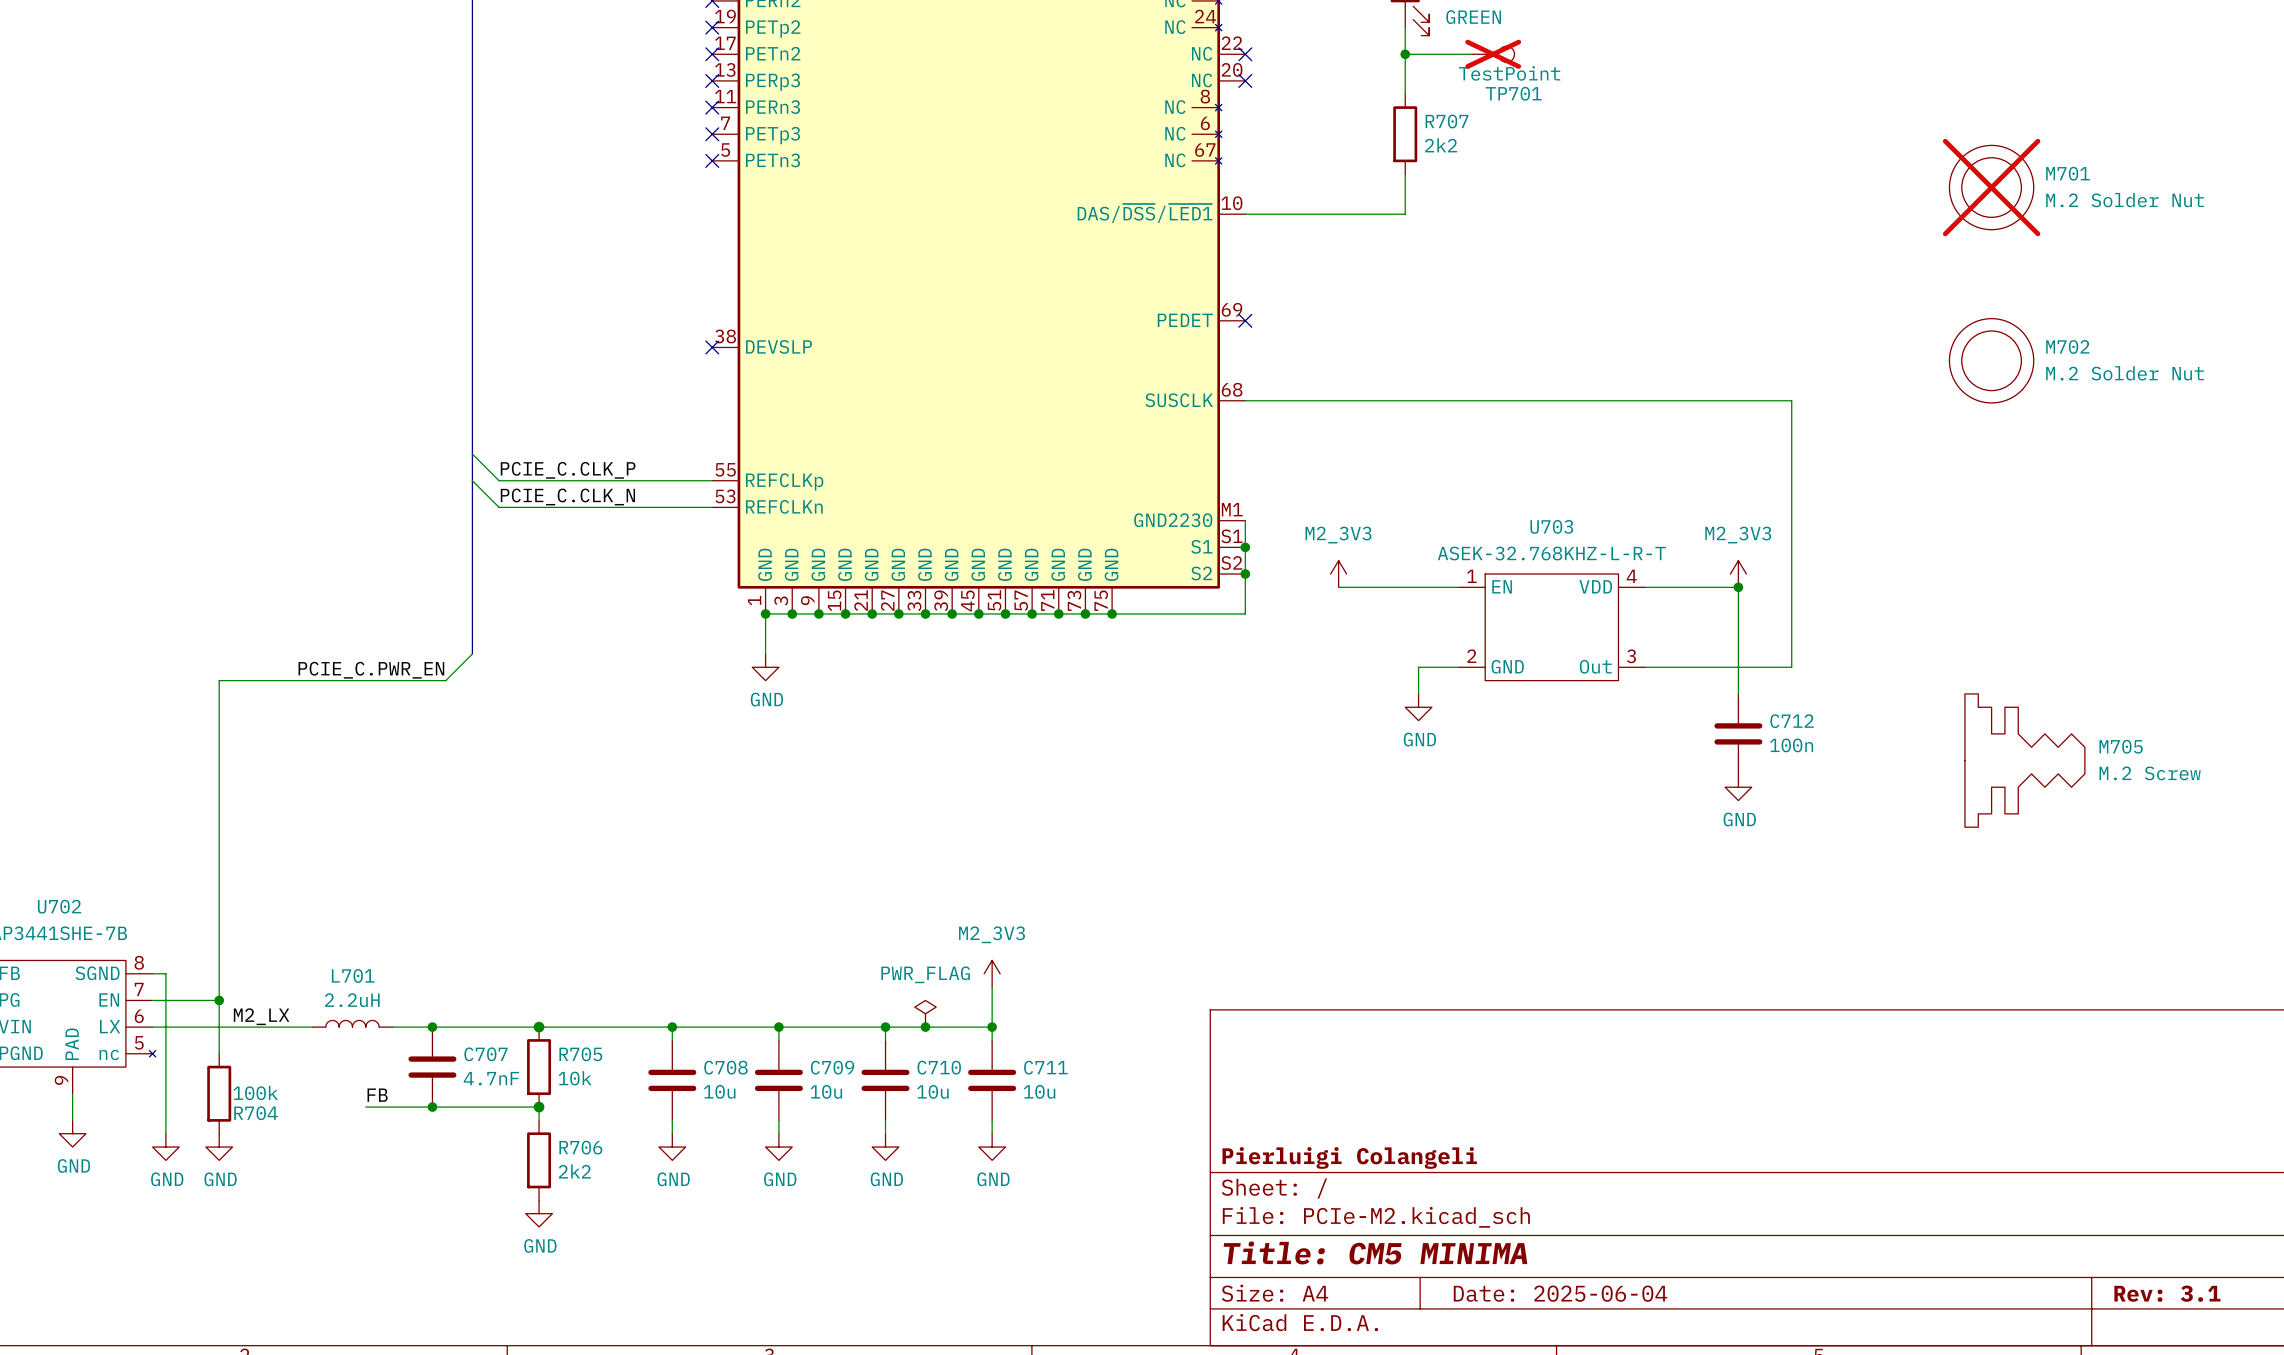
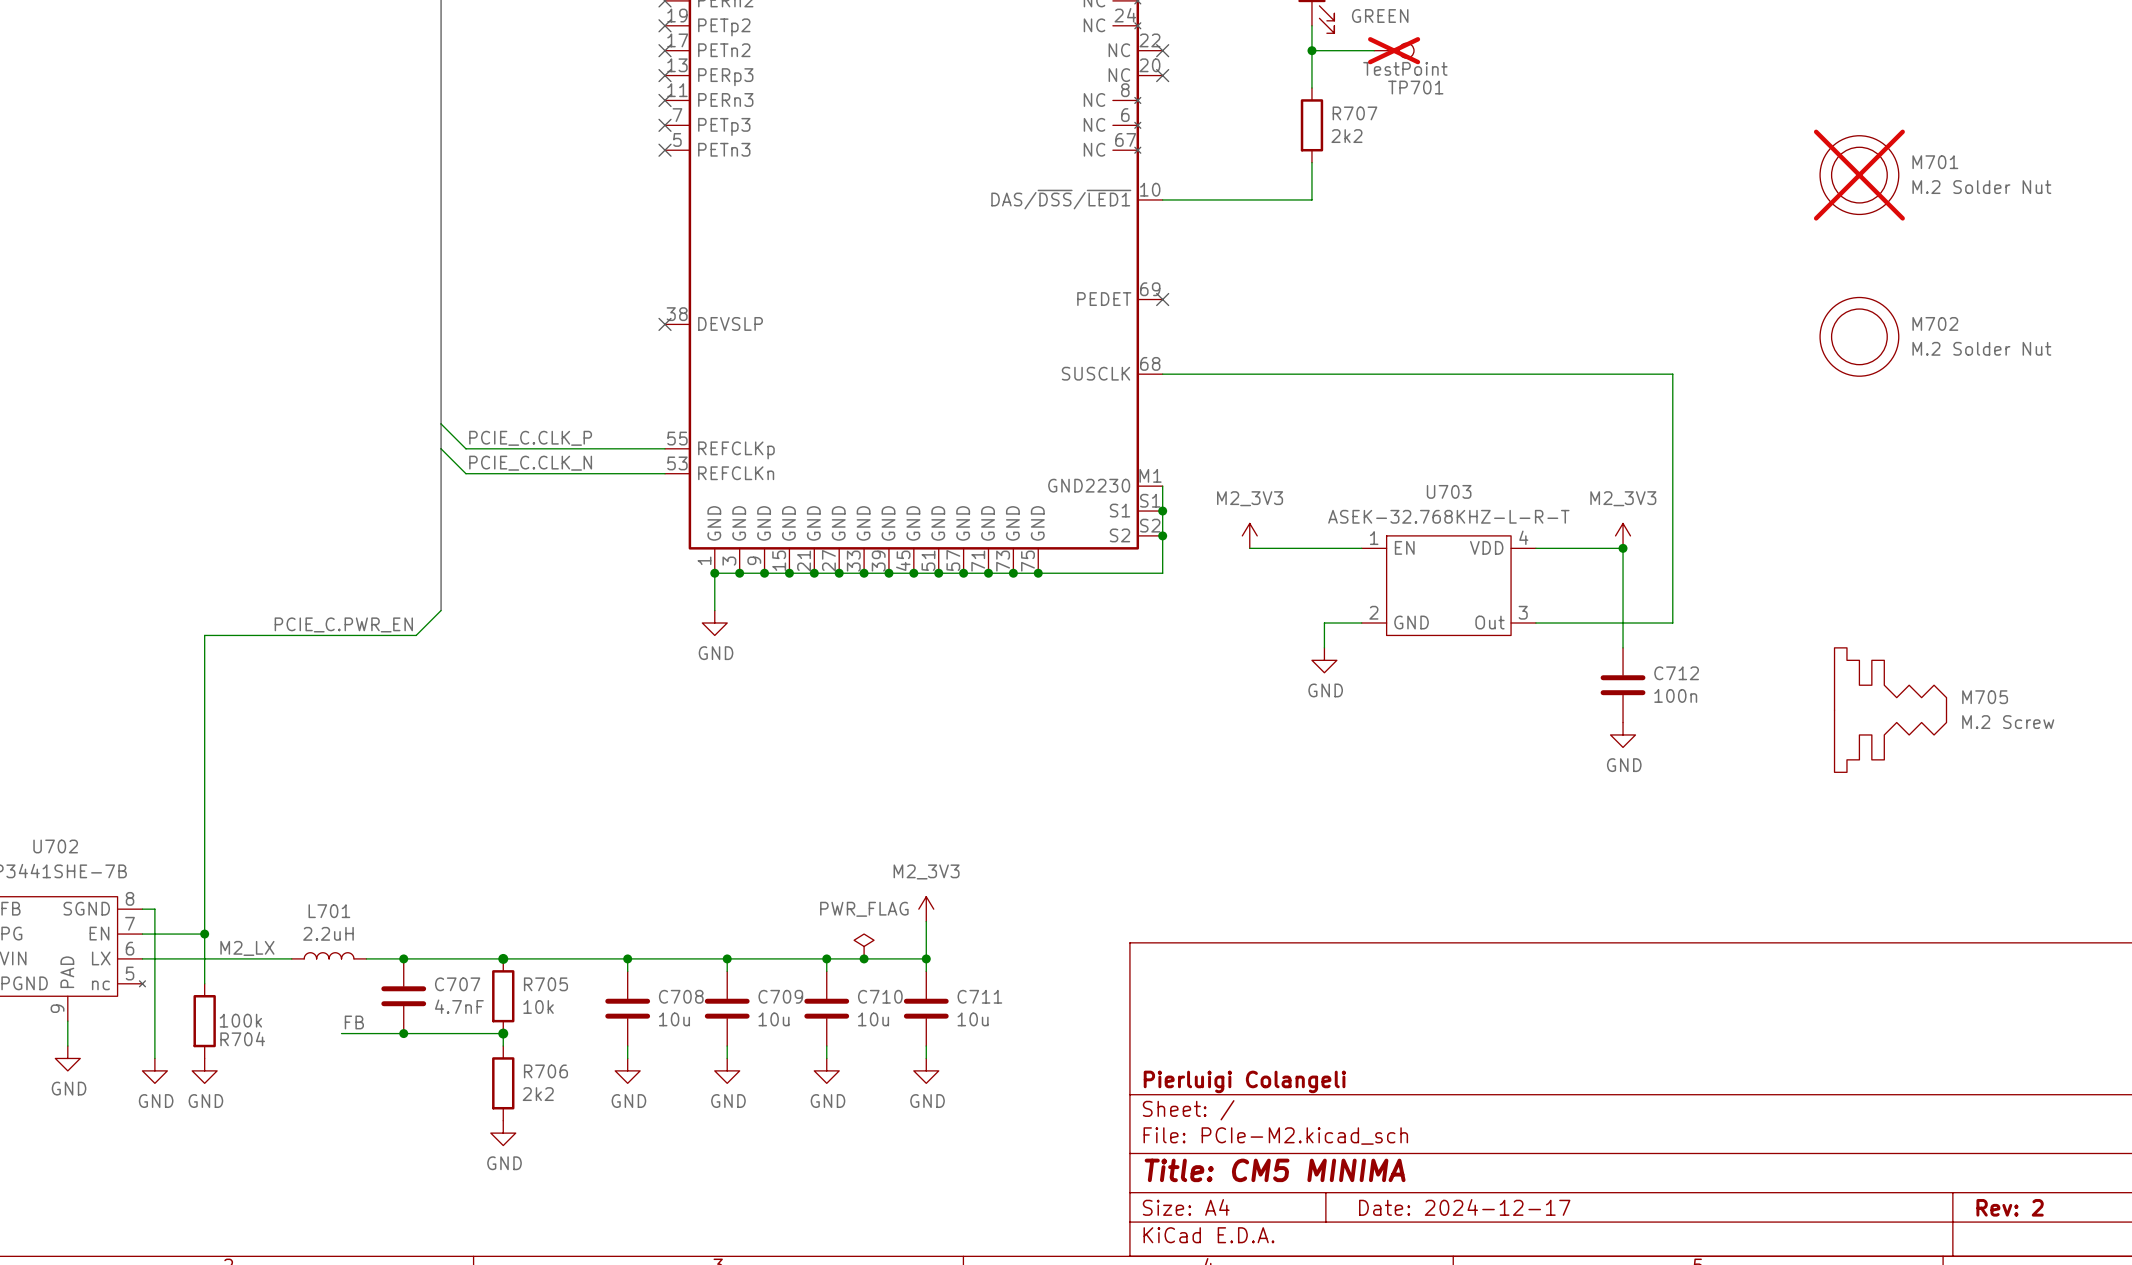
title block: Date: 2025-06-04 (1560, 1293) -> Date: 2024-12-17 (1464, 1207)
title block: Rev: 3.1 (2167, 1293) -> Rev: 2 (2010, 1207)

